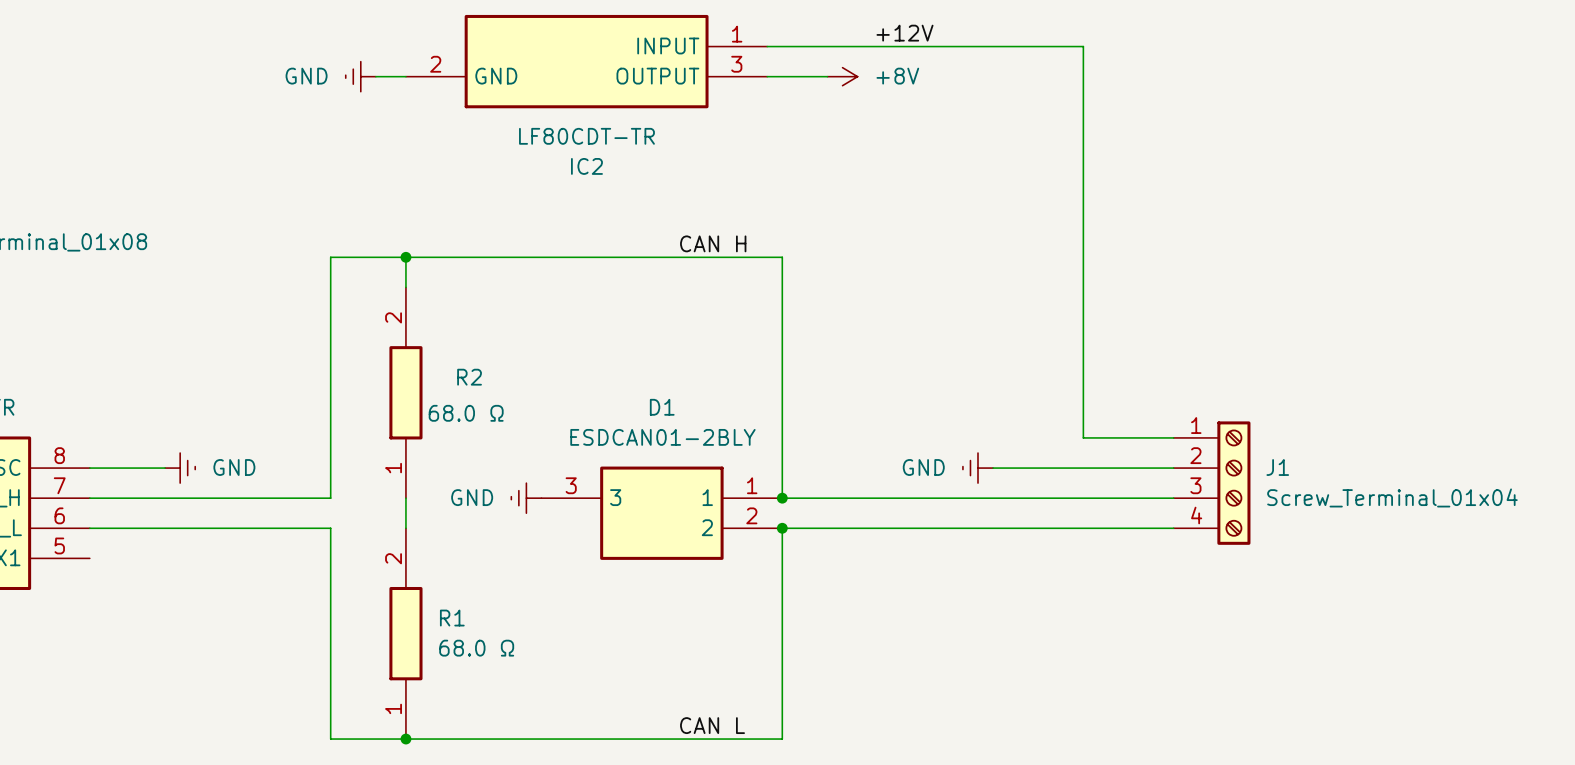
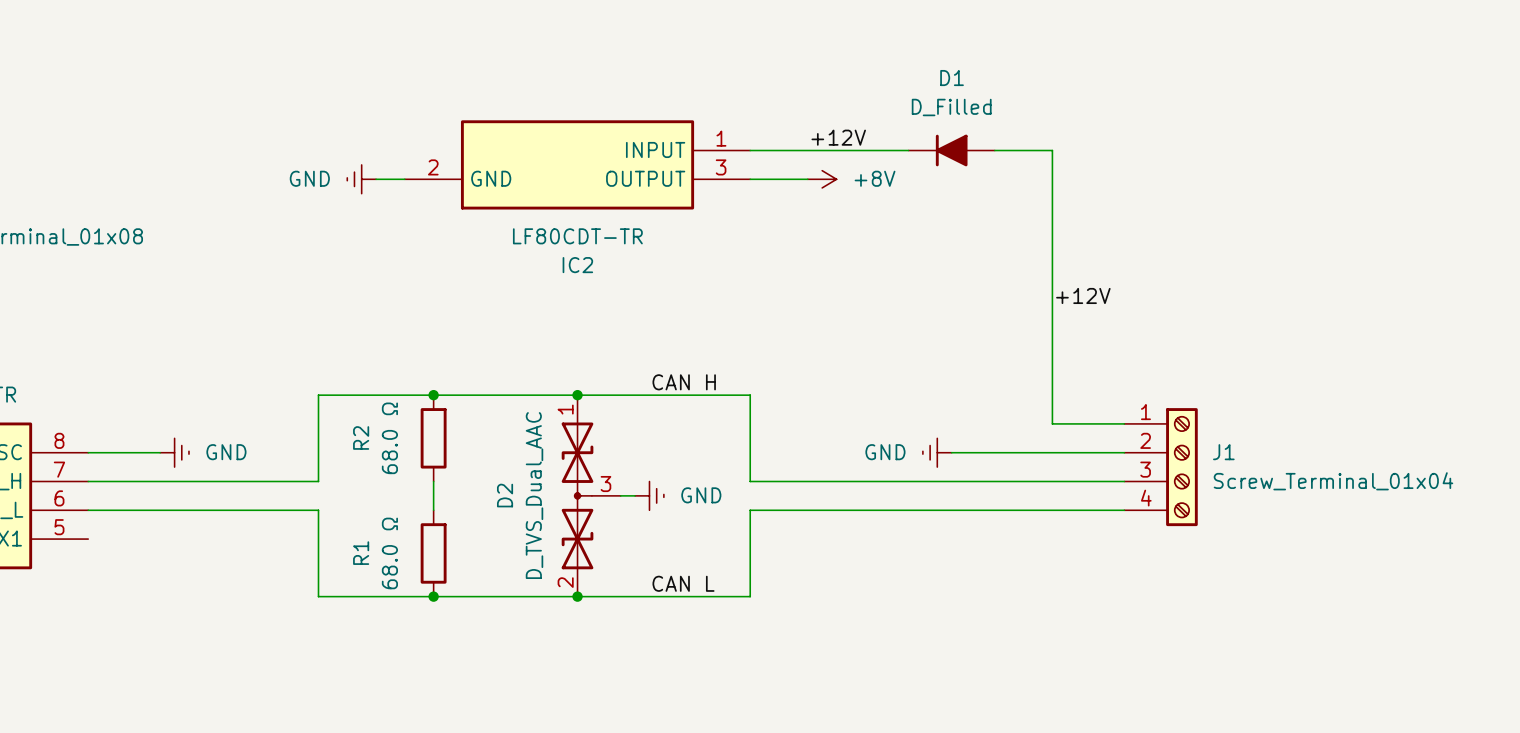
label position: +12V (904, 33) -> +12V (838, 137)
wire: (767, 46) (1083, 46) (1083, 437) (1098, 437) -> (994, 150) (1052, 150) (1052, 423)
IC2 position: (586, 61) -> (577, 164)
power symbol position: GND (360, 76) -> GND (361, 179)
wire: (375, 76) (405, 76) -> (376, 179) (404, 179)
wire: (767, 76) (827, 76) -> (750, 179) (807, 179)
power symbol position: +8V (842, 76) -> +8V (822, 179)
wire: none -> (750, 150) (908, 150)
label position: CAN H (713, 243) -> CAN H (684, 382)
wire: (405, 257) (405, 287) -> none
junction: (405, 257) -> none
R2 symbol: [389, 287, 423, 499] -> [420, 395, 447, 482]
label: none -> +12V (1083, 295)
R2 name position: R2 (469, 377) -> R2 (361, 437)
wire: (330, 407) (330, 257) (782, 257) (782, 407) -> (318, 395) (750, 395)
junction: none -> (433, 395)
junction: none -> (577, 395)
D1 name position: D1 (662, 407) -> D1 (952, 78)
R2 value position: 68.0 Ω (466, 413) -> 68.0 Ω (389, 438)
D1 value: ESDCAN01-2BLY (662, 437) -> D_Filled (951, 107)
D1 symbol: [541, 466, 783, 560] -> [908, 134, 995, 167]
wire: (405, 498) (405, 528) -> (433, 481) (433, 510)
power symbol rotation: 0° (526, 498) -> 180° (649, 495)
power symbol position: GND (526, 498) -> GND (649, 495)
junction: (782, 498) -> none
D2: none -> D_TVS_Dual_AAC (591, 495)
R1 symbol: [389, 528, 423, 740] -> [420, 510, 447, 597]
junction: (782, 528) -> none
wire: (330, 618) (330, 739) (782, 739) (782, 618) -> (318, 596) (750, 596)
junction: none -> (433, 596)
R1 name position: R1 (452, 618) -> R1 (361, 553)
junction: none -> (577, 596)
R1 value position: 68.0 Ω (476, 648) -> 68.0 Ω (389, 553)
label position: CAN L (712, 725) -> CAN L (683, 583)
junction: (405, 739) -> none

